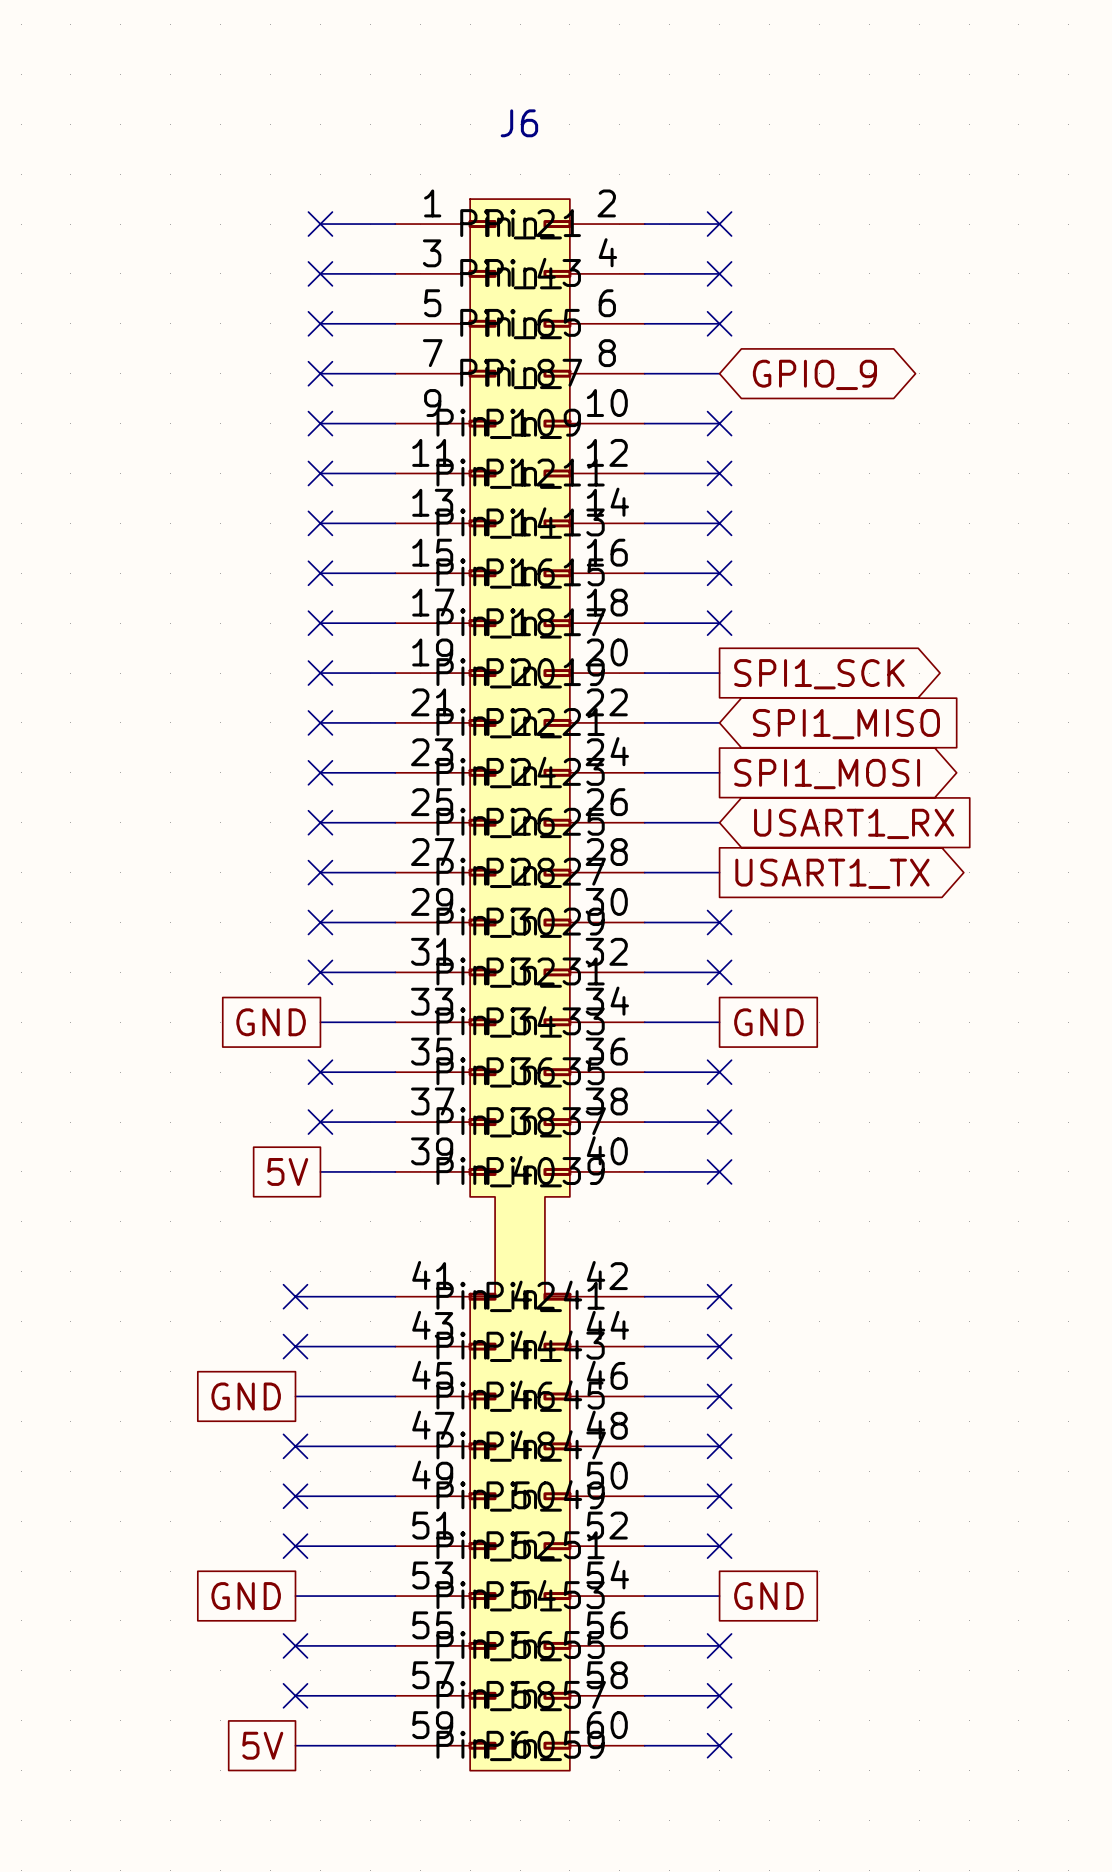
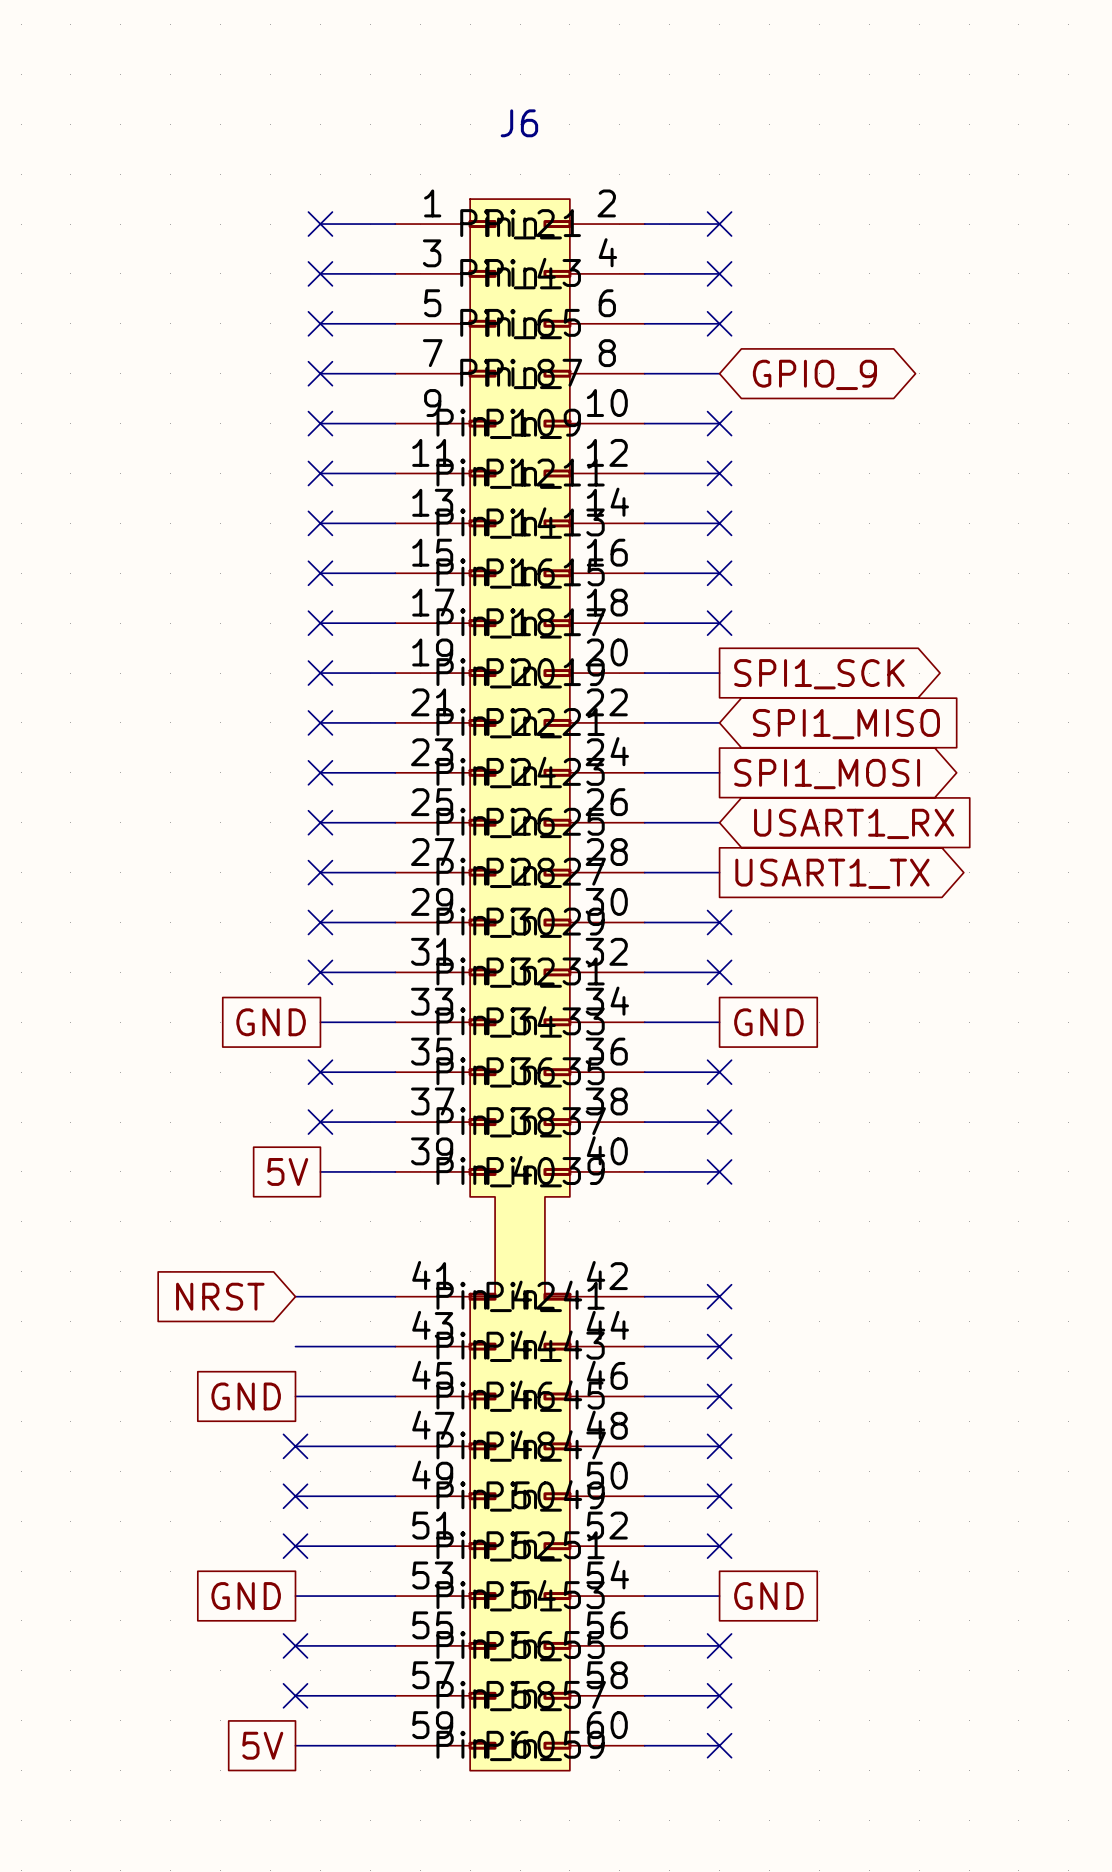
global label: none -> NRST (220, 1296)
no-connect mark: (295, 1296) -> none
no-connect mark: (295, 1346) -> none

